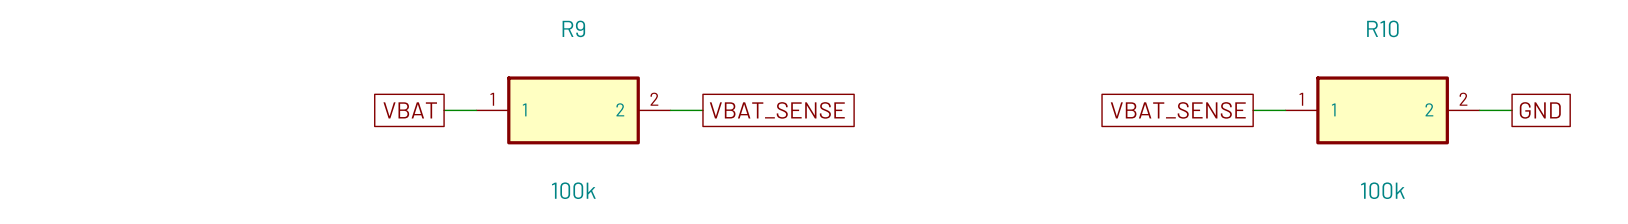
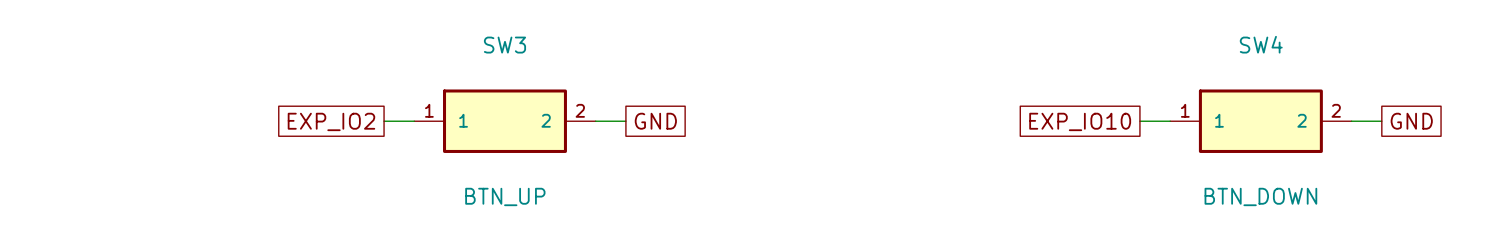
R9 name: R9 (573, 28) -> SW3 (504, 45)
R10 name: R10 (1382, 28) -> SW4 (1261, 44)
global label: VBAT (410, 110) -> EXP_IO2 (331, 121)
global label: VBAT_SENSE (777, 110) -> GND (655, 121)
global label: VBAT_SENSE (1178, 110) -> EXP_IO10 (1080, 121)
R9 value: 100k (573, 190) -> BTN_UP (505, 196)
R10 value: 100k (1382, 190) -> BTN_DOWN (1260, 196)

